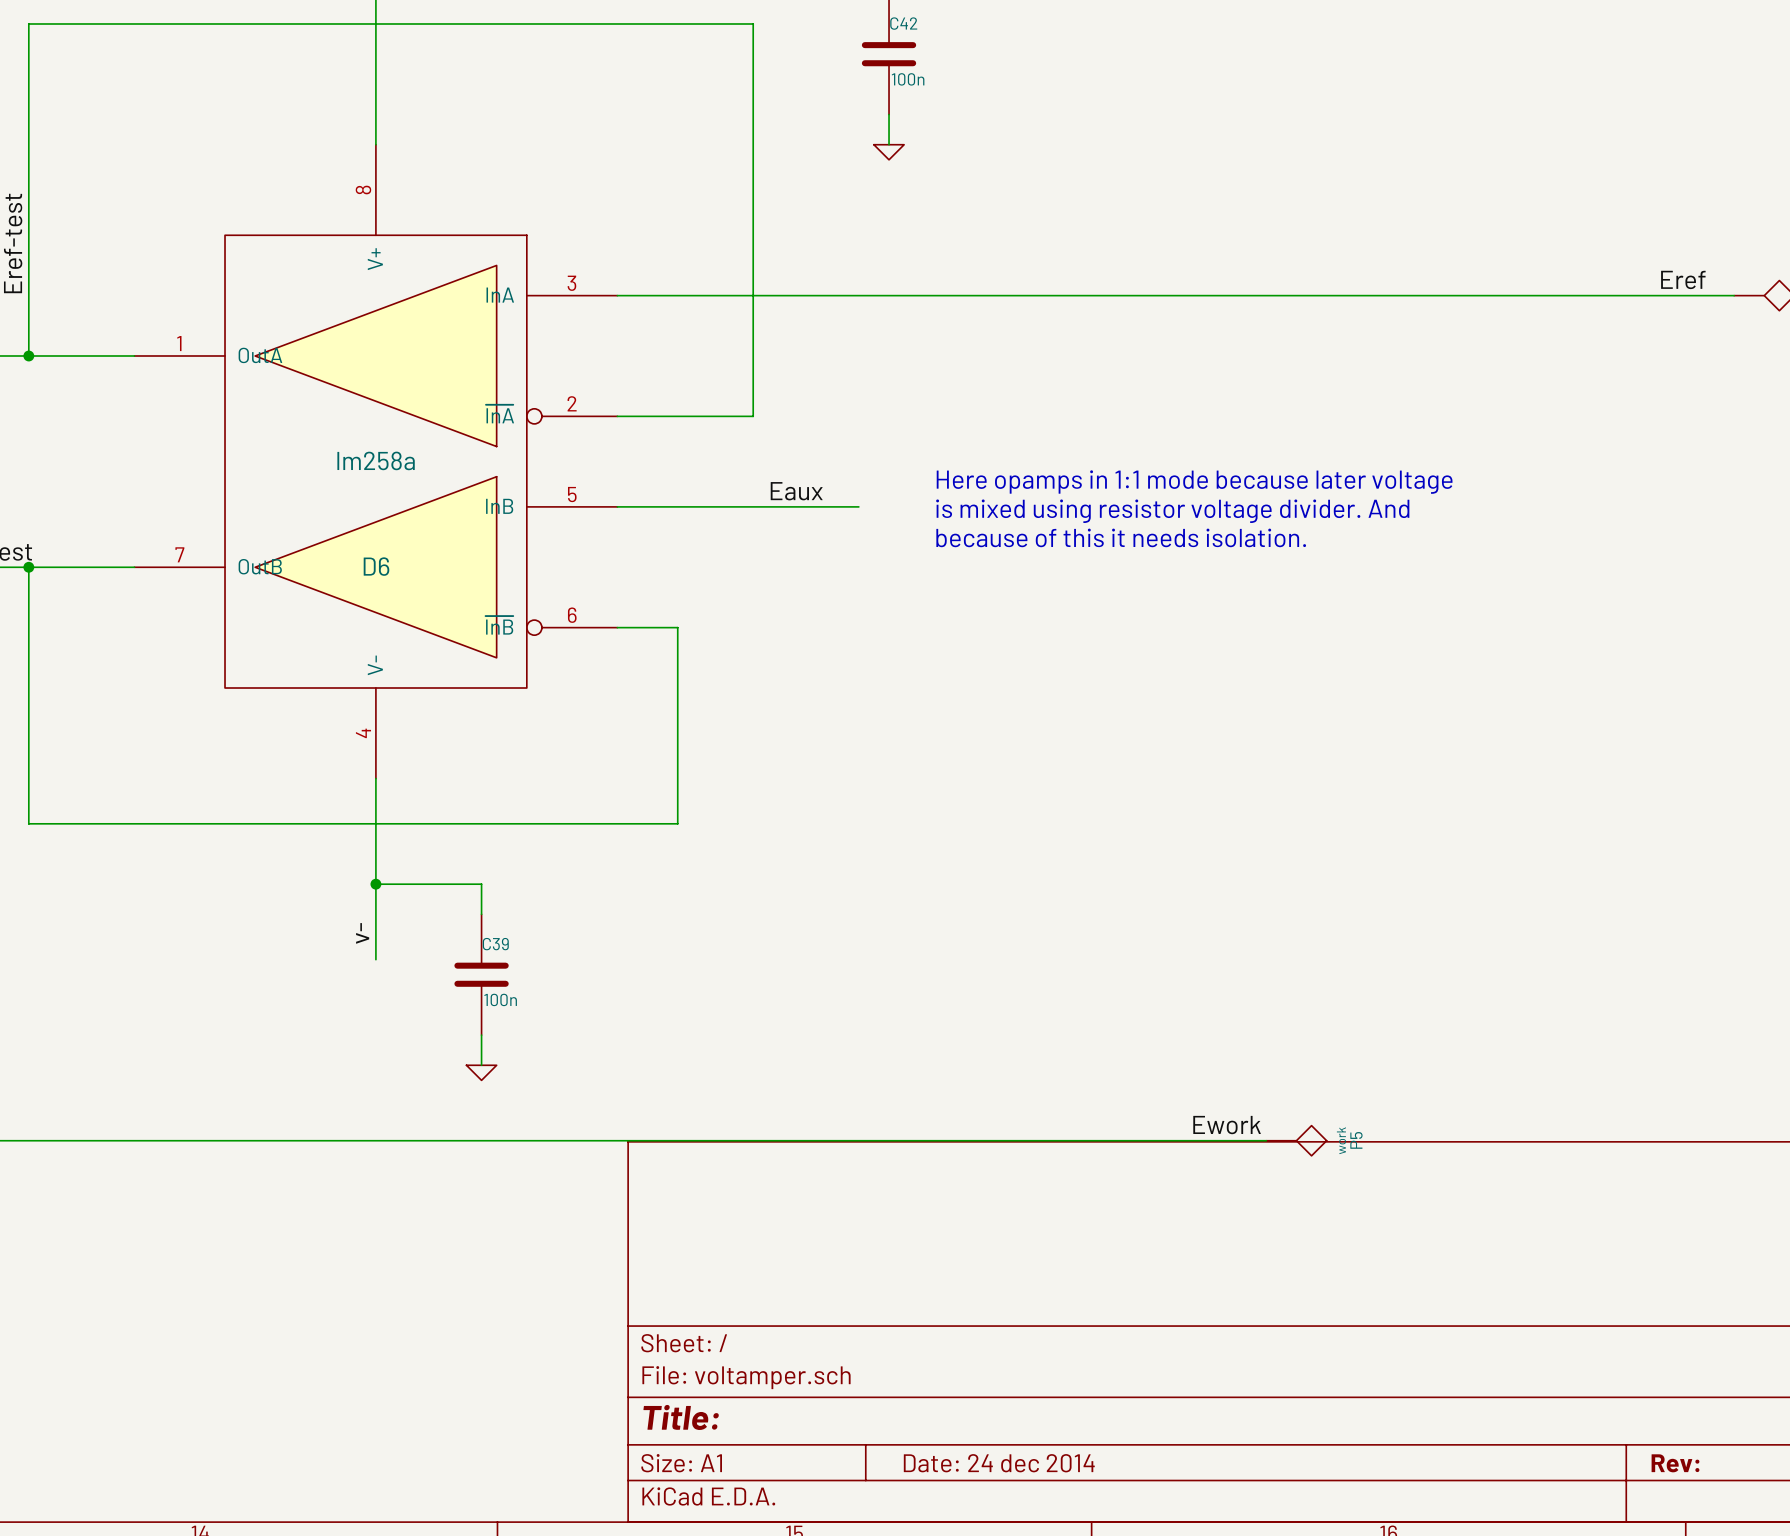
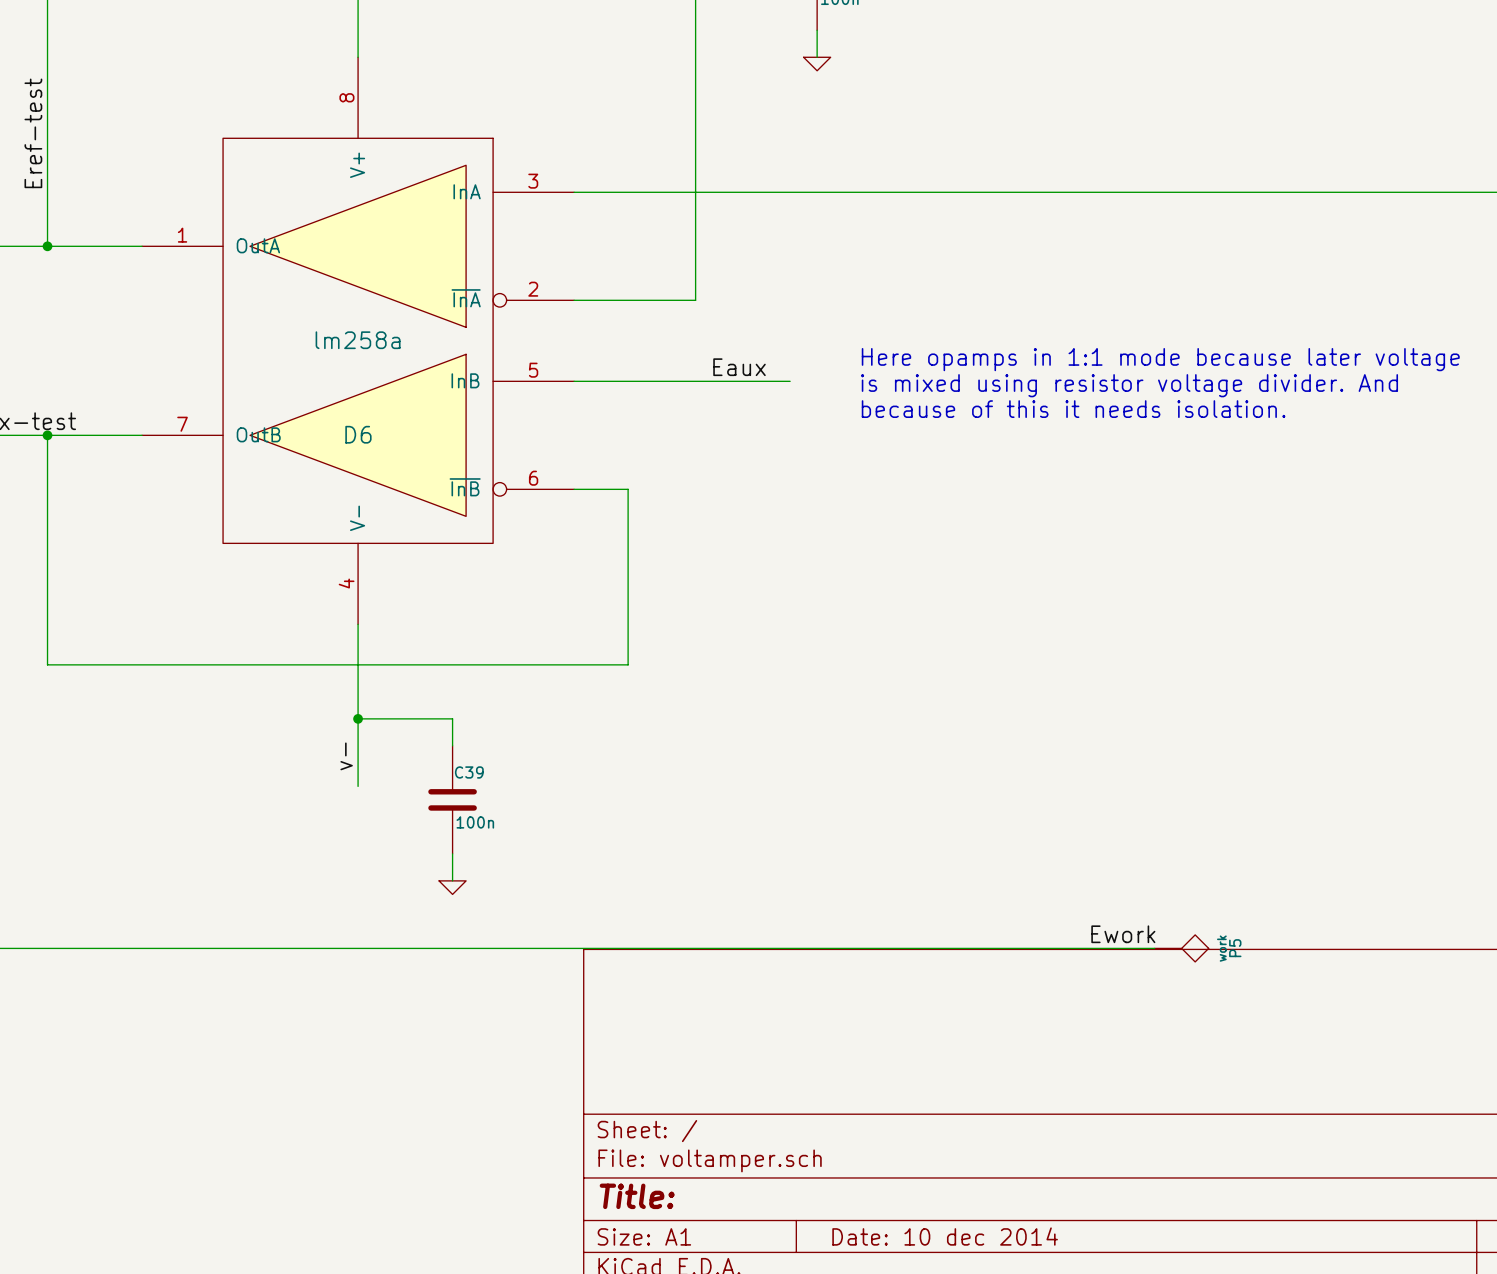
title block: Date: 24 dec 2014 (999, 1463) -> Date: 10 dec 2014 (945, 1236)

